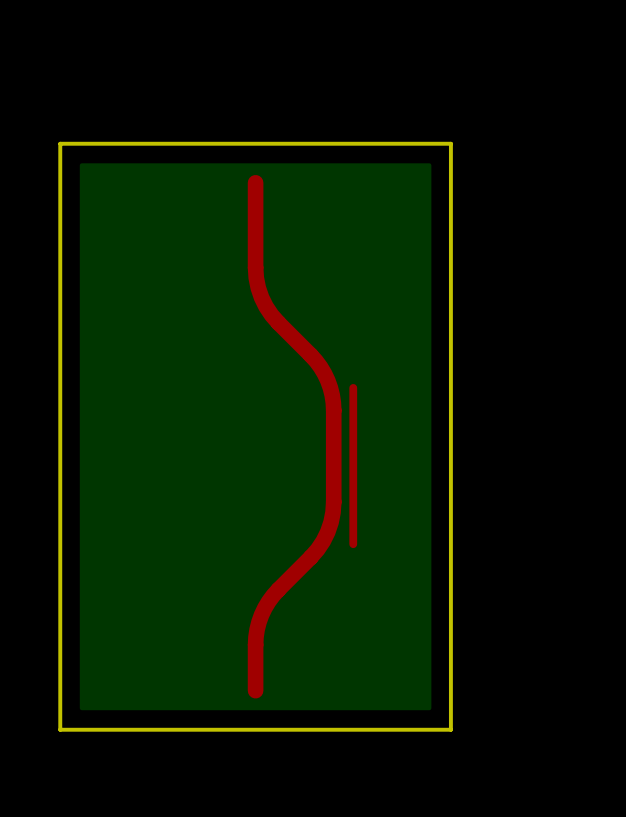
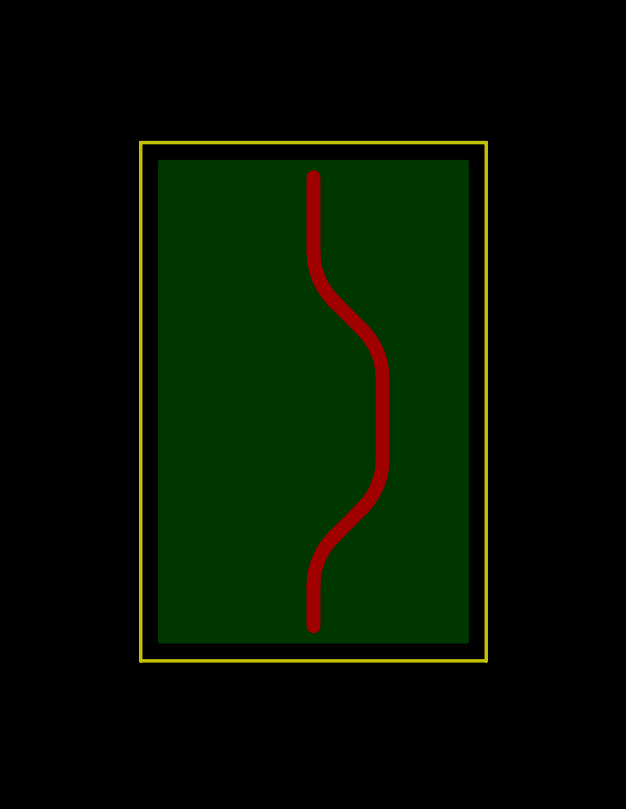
top track: (353, 387) (353, 544) -> none

